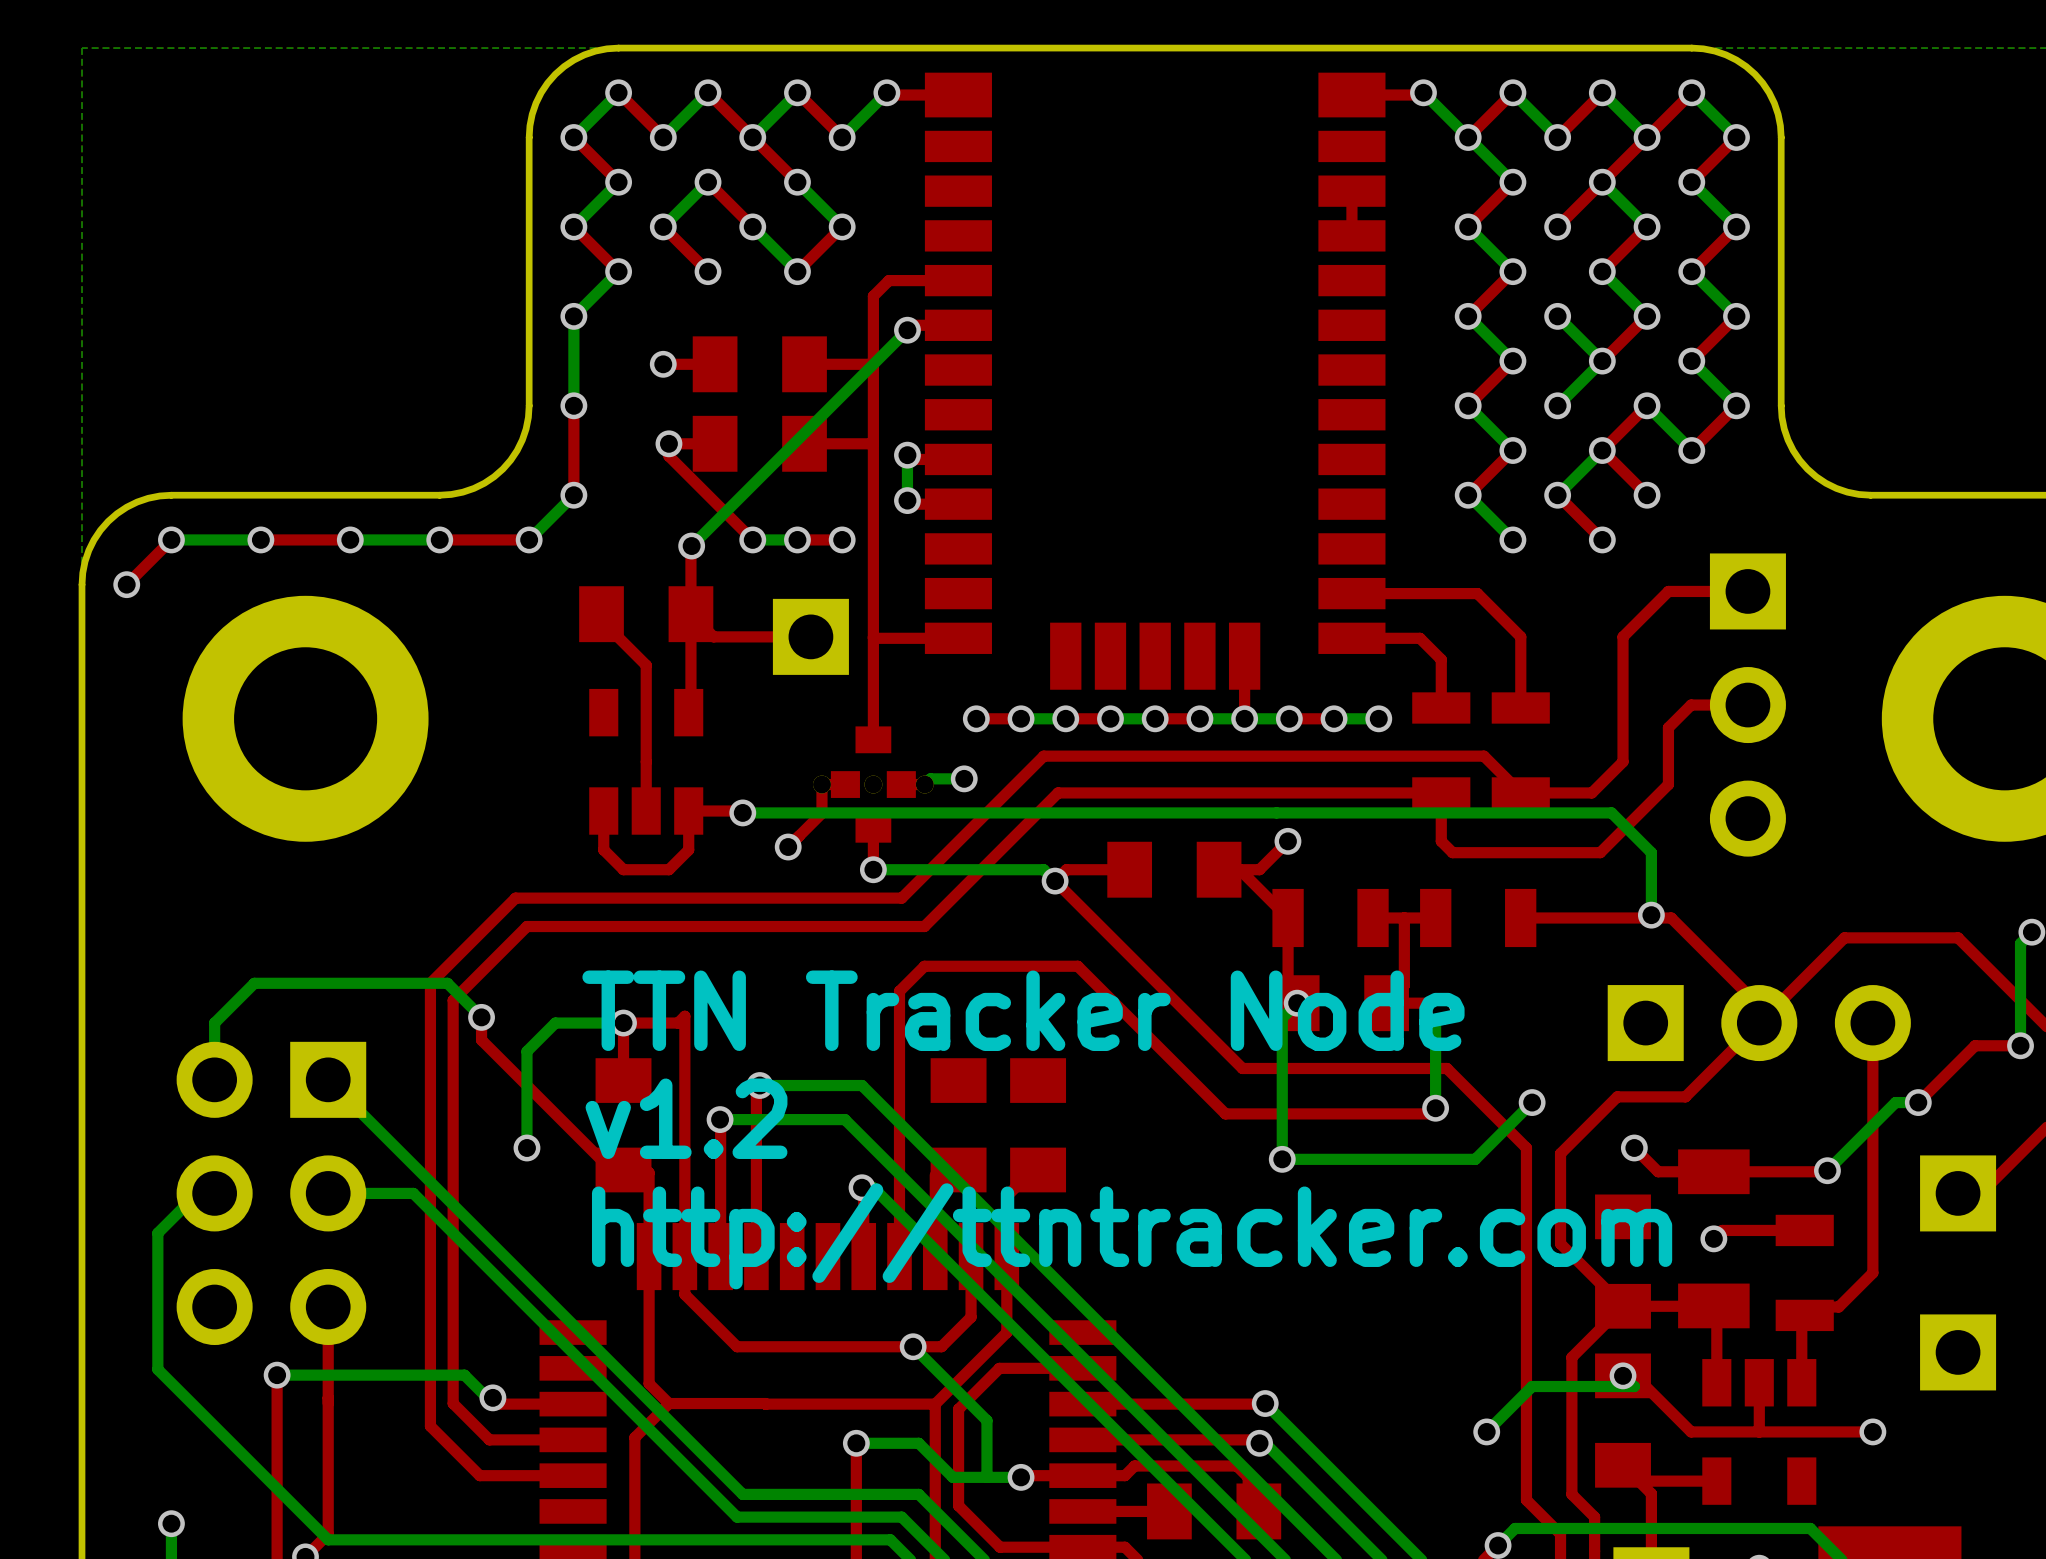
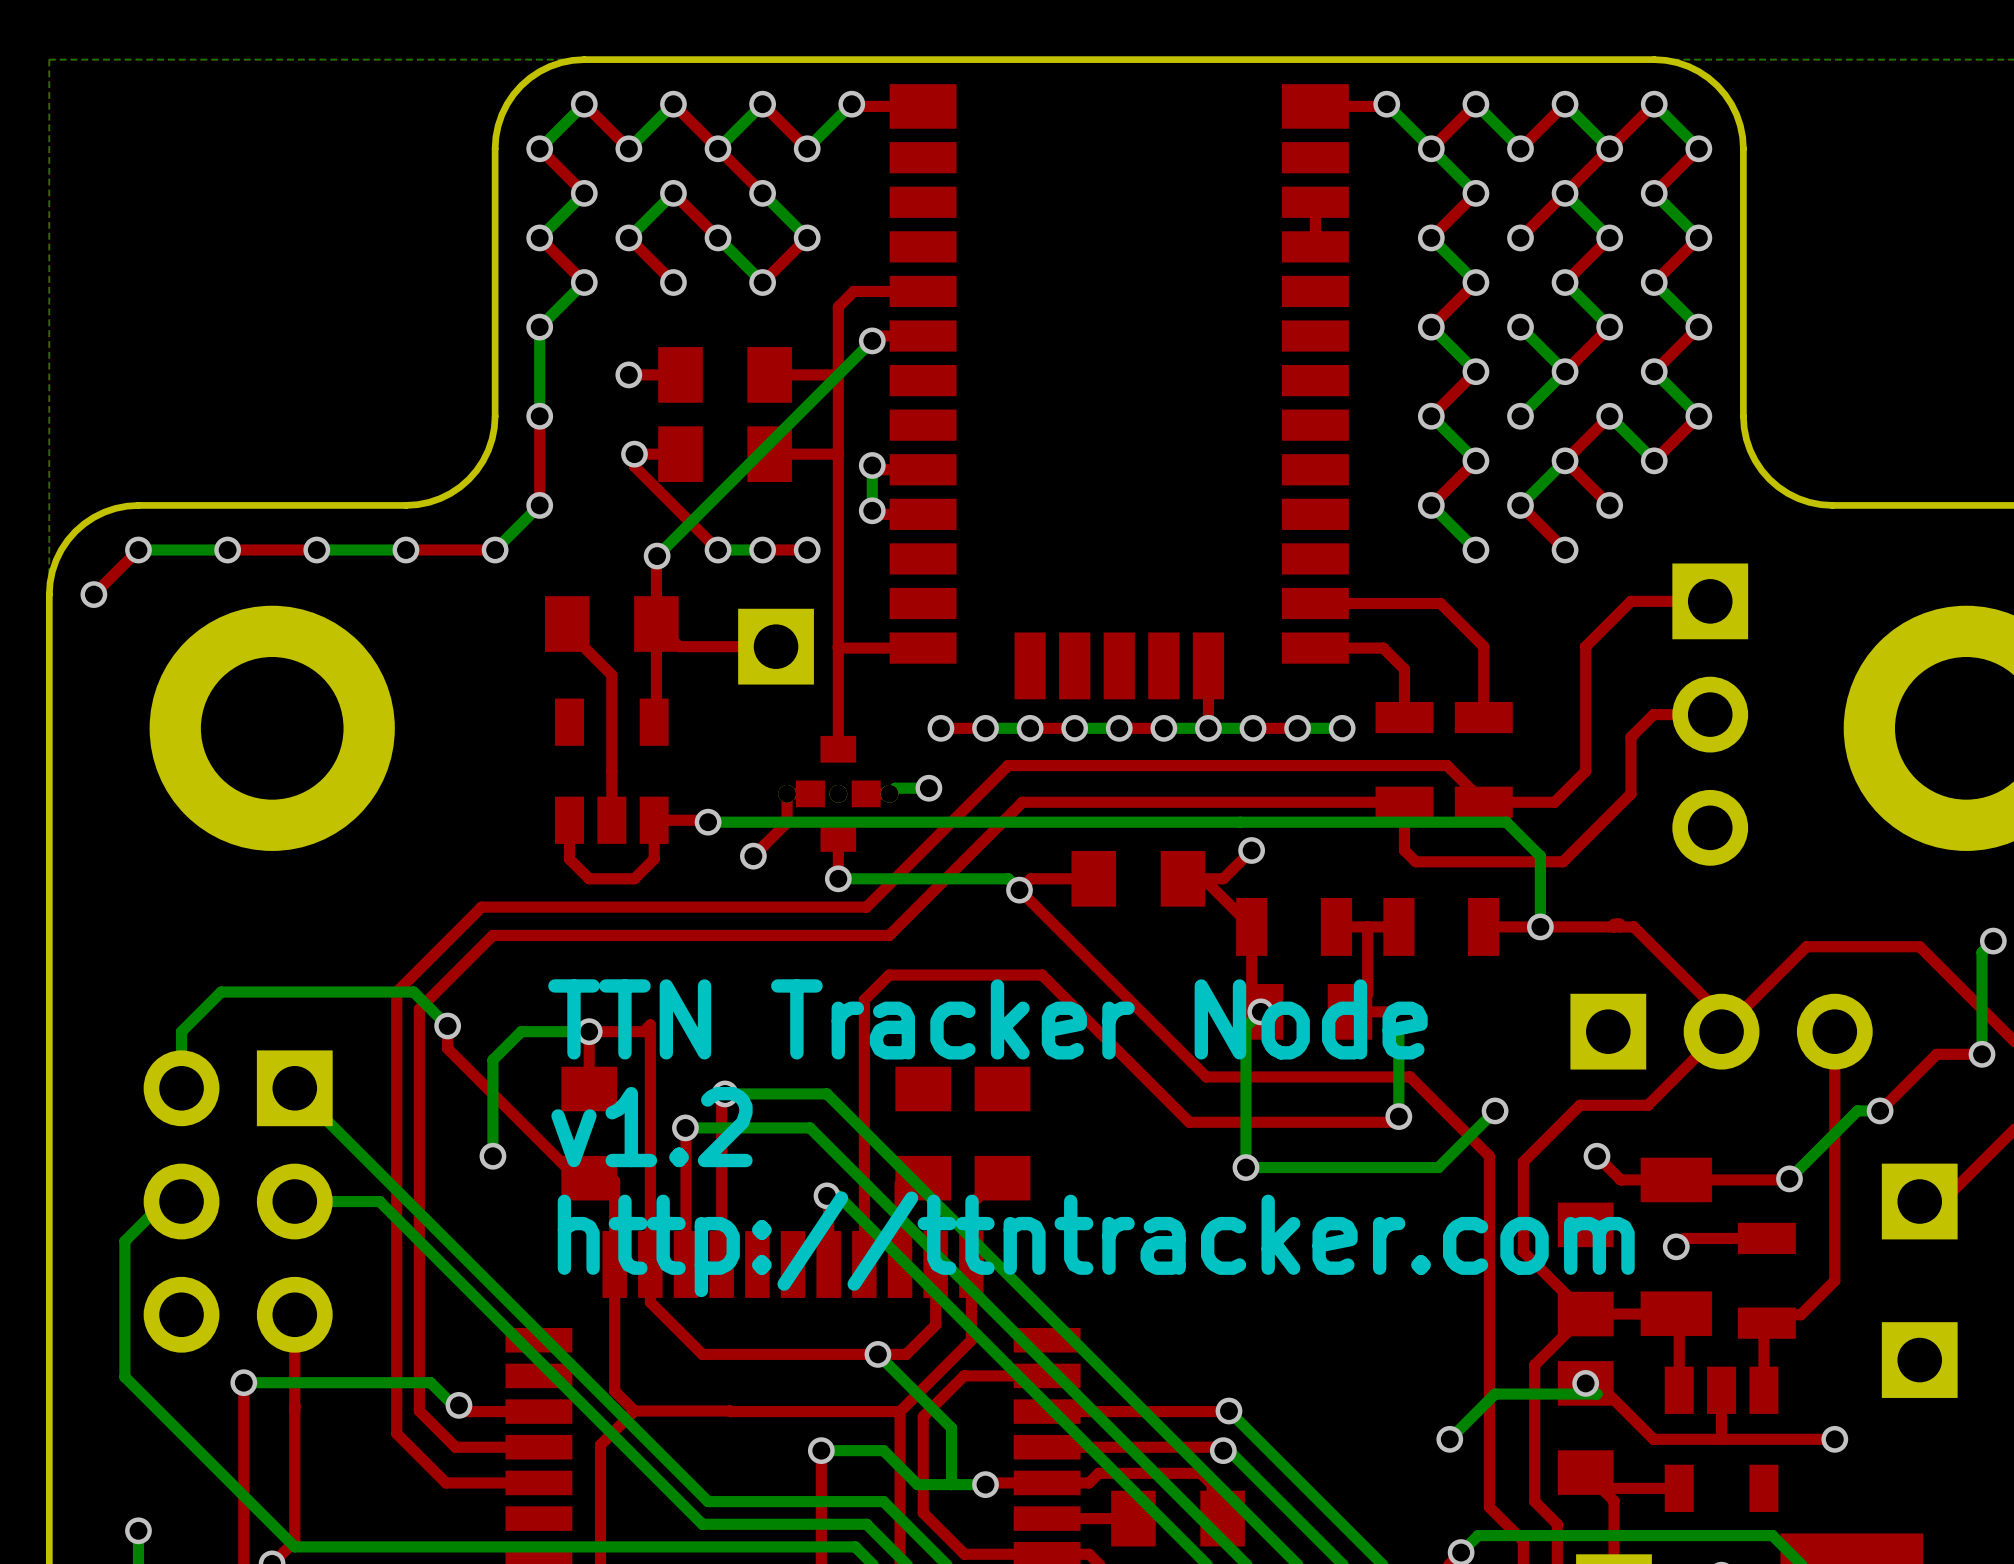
bottom track: (1543, 812) (1611, 812) (1651, 852) (1651, 915) -> (1506, 822) (1540, 856) (1540, 926)
via position: (1651, 915) -> (1540, 926)

